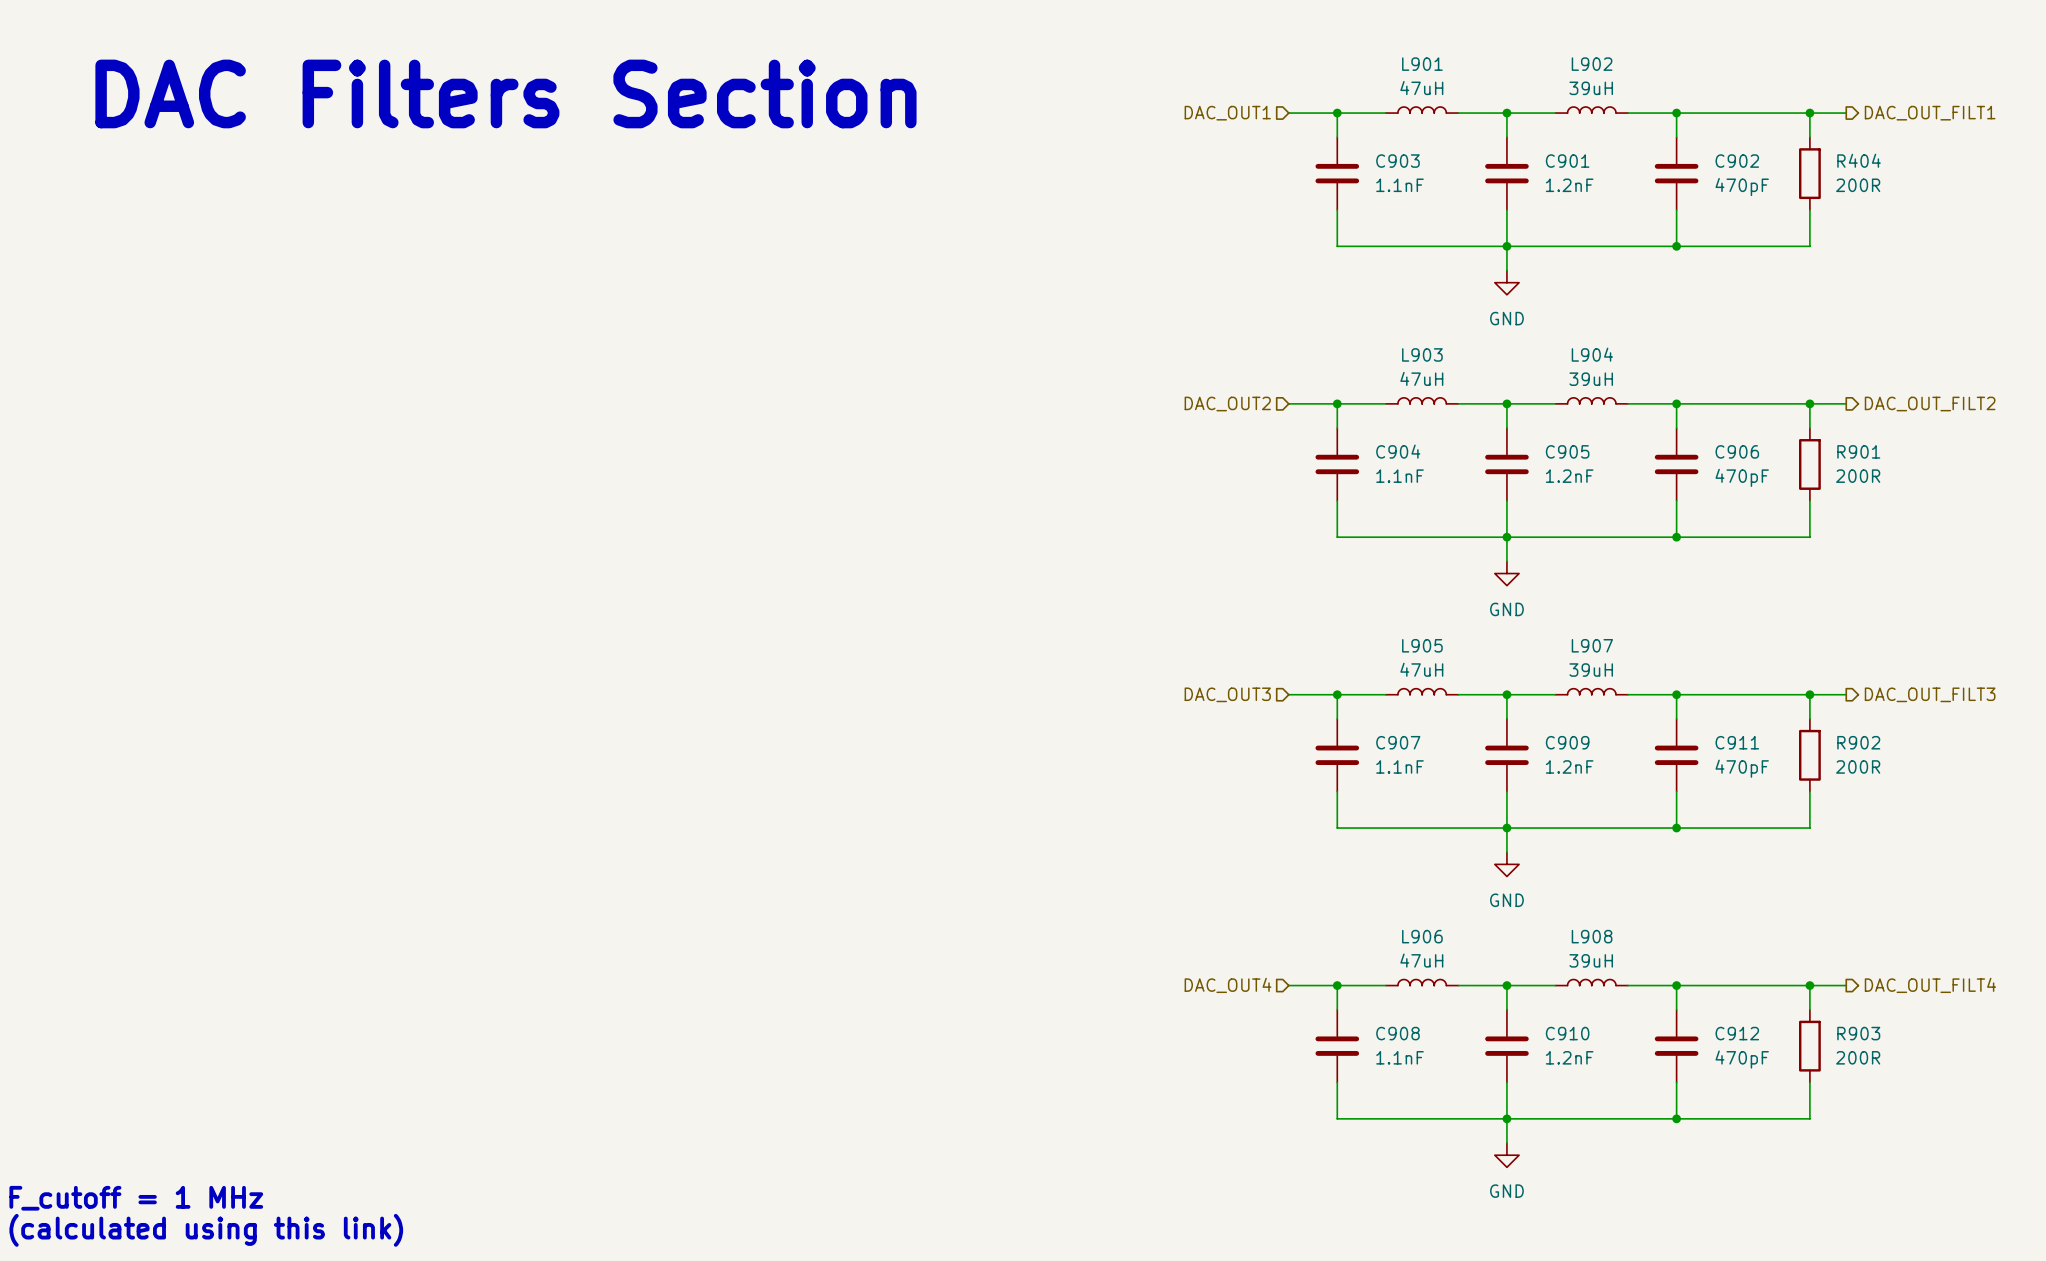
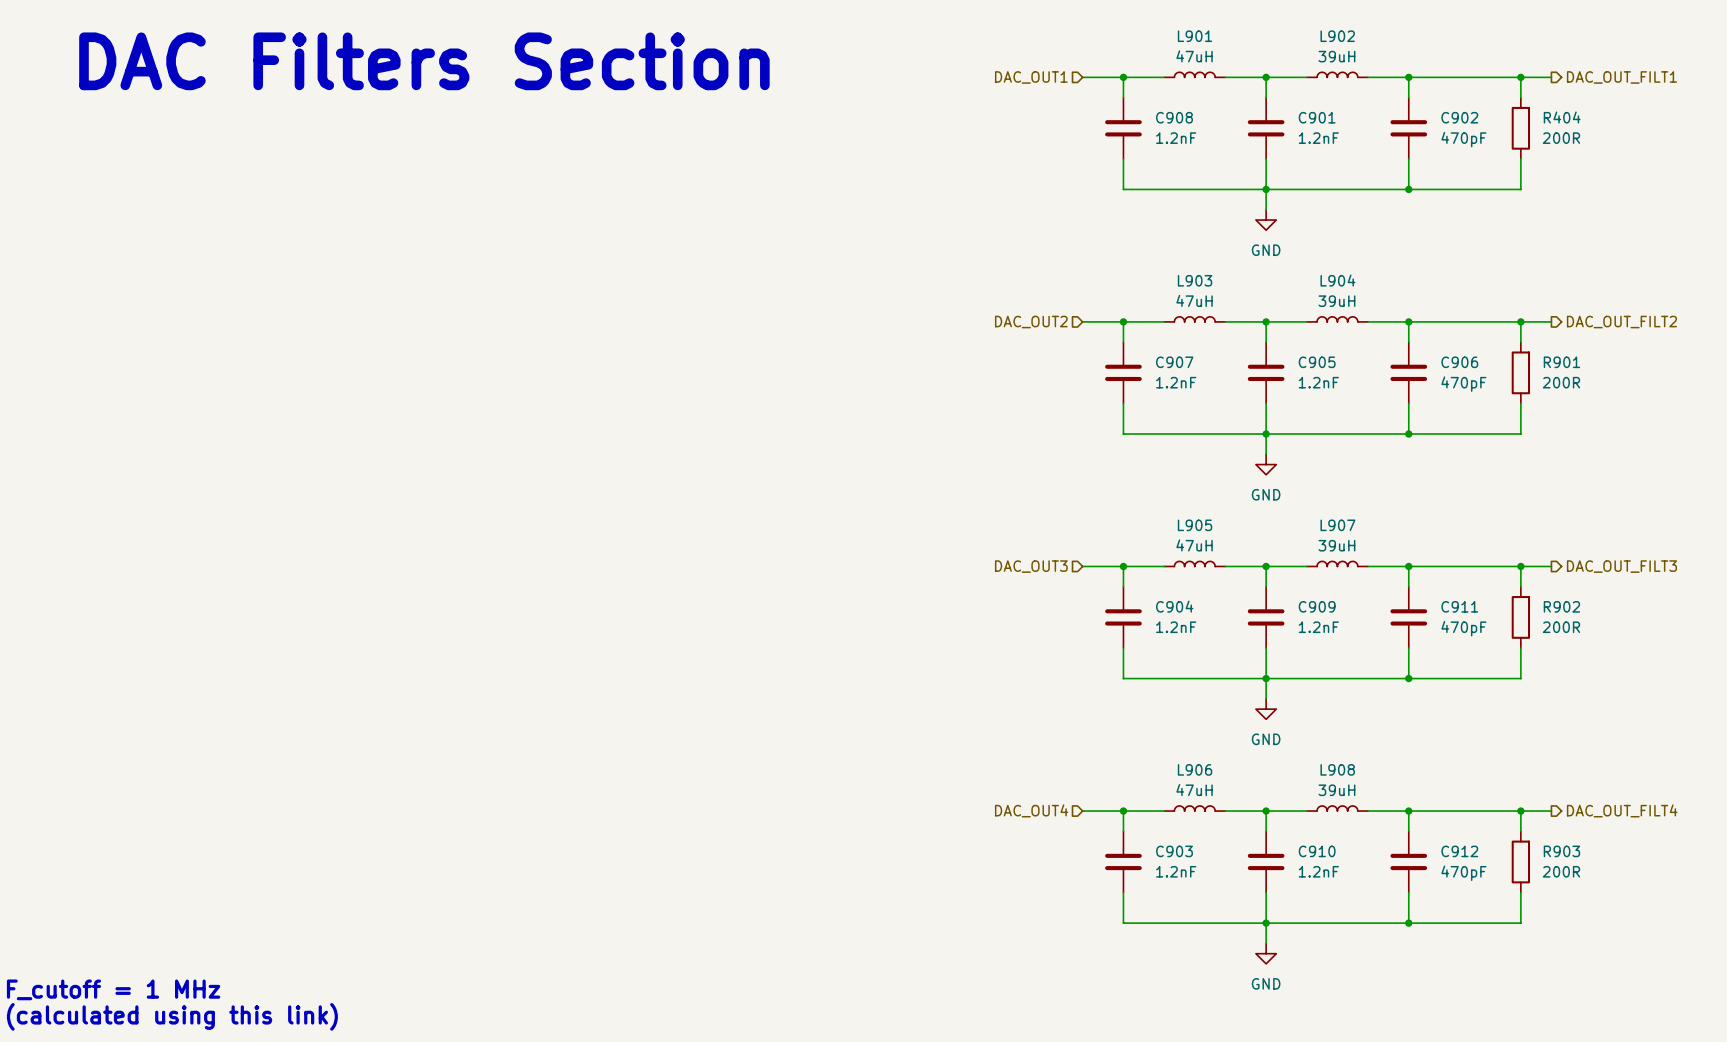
C903 name: C903 (1397, 161) -> C908 (1174, 117)
C903 value: 1.1nF (1399, 185) -> 1.2nF (1176, 138)
C904 name: C904 (1398, 451) -> C907 (1174, 362)
C904 value: 1.1nF (1399, 476) -> 1.2nF (1176, 382)
C907 name: C907 (1398, 742) -> C904 (1174, 606)
C907 value: 1.1nF (1399, 766) -> 1.2nF (1176, 627)
C908 name: C908 (1397, 1033) -> C903 (1174, 851)
C908 value: 1.1nF (1399, 1057) -> 1.2nF (1176, 871)

